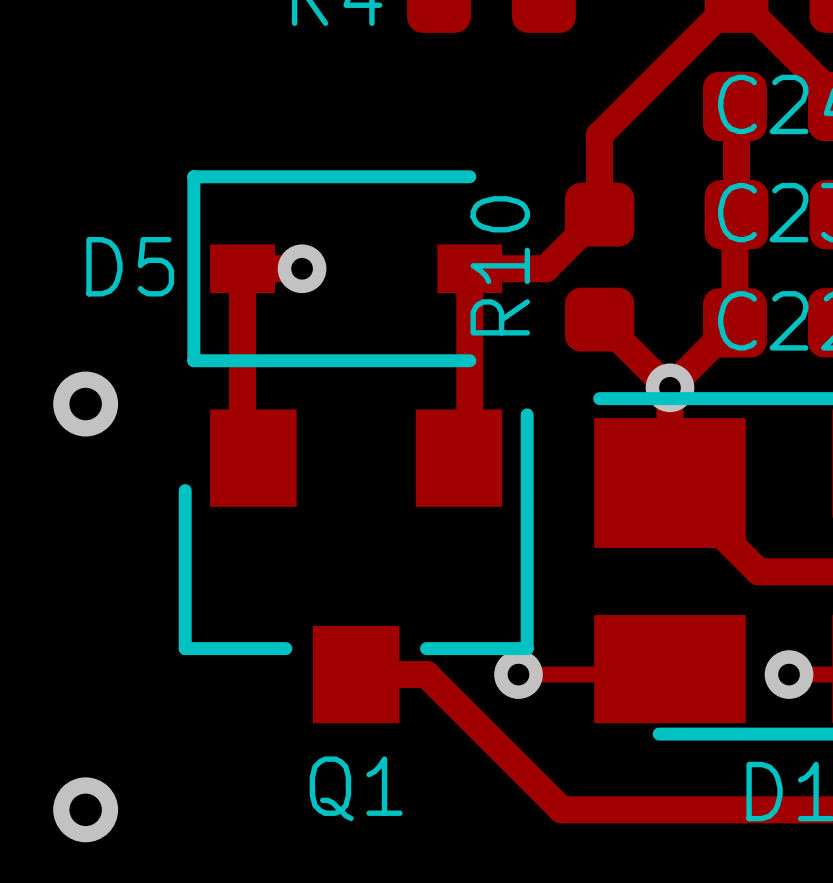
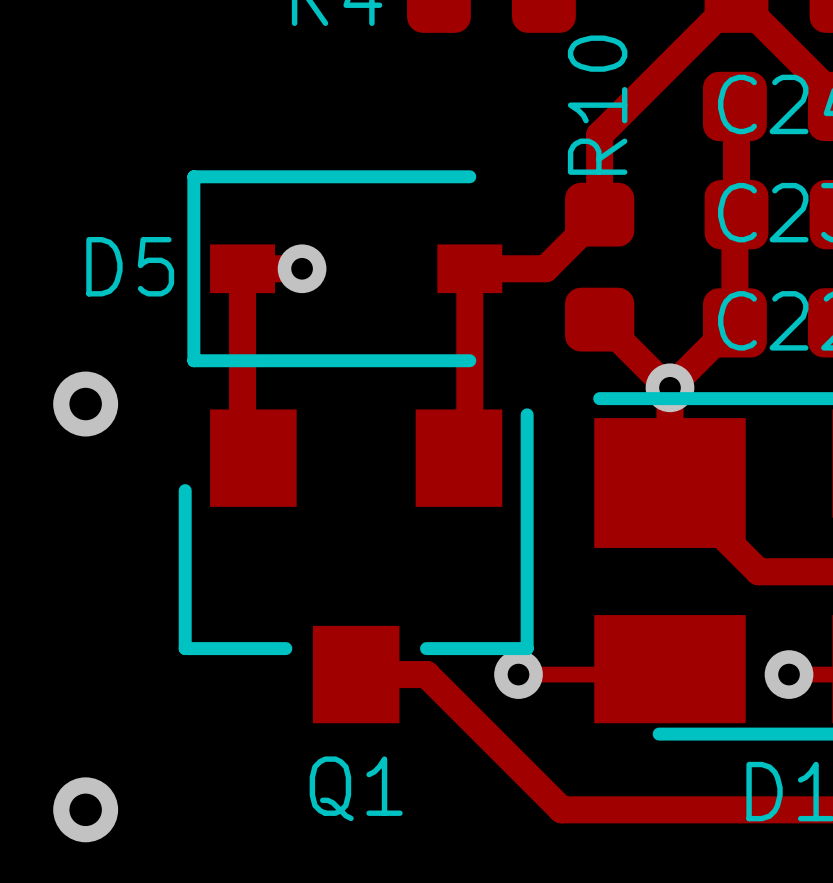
R10 name position: R10 (500, 265) -> R10 (597, 105)

